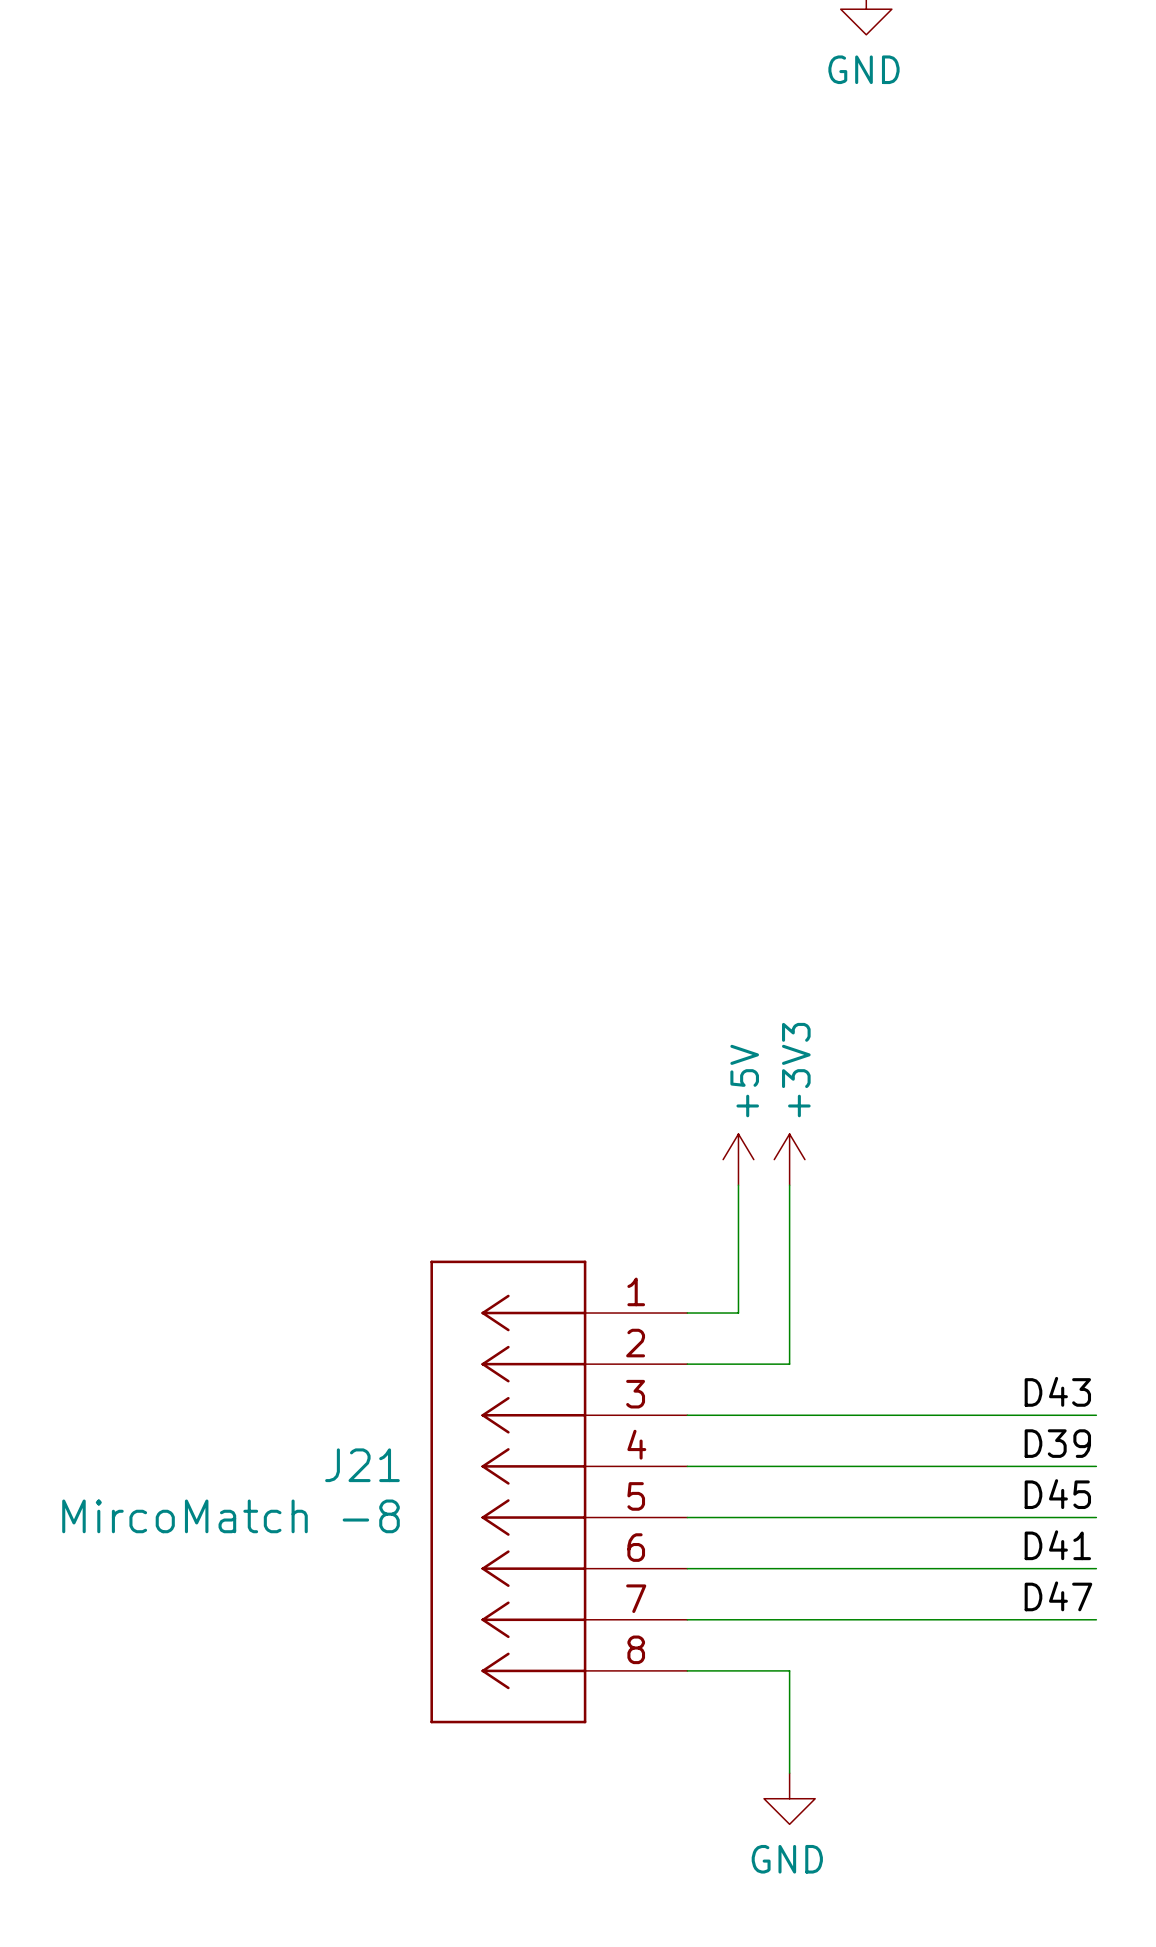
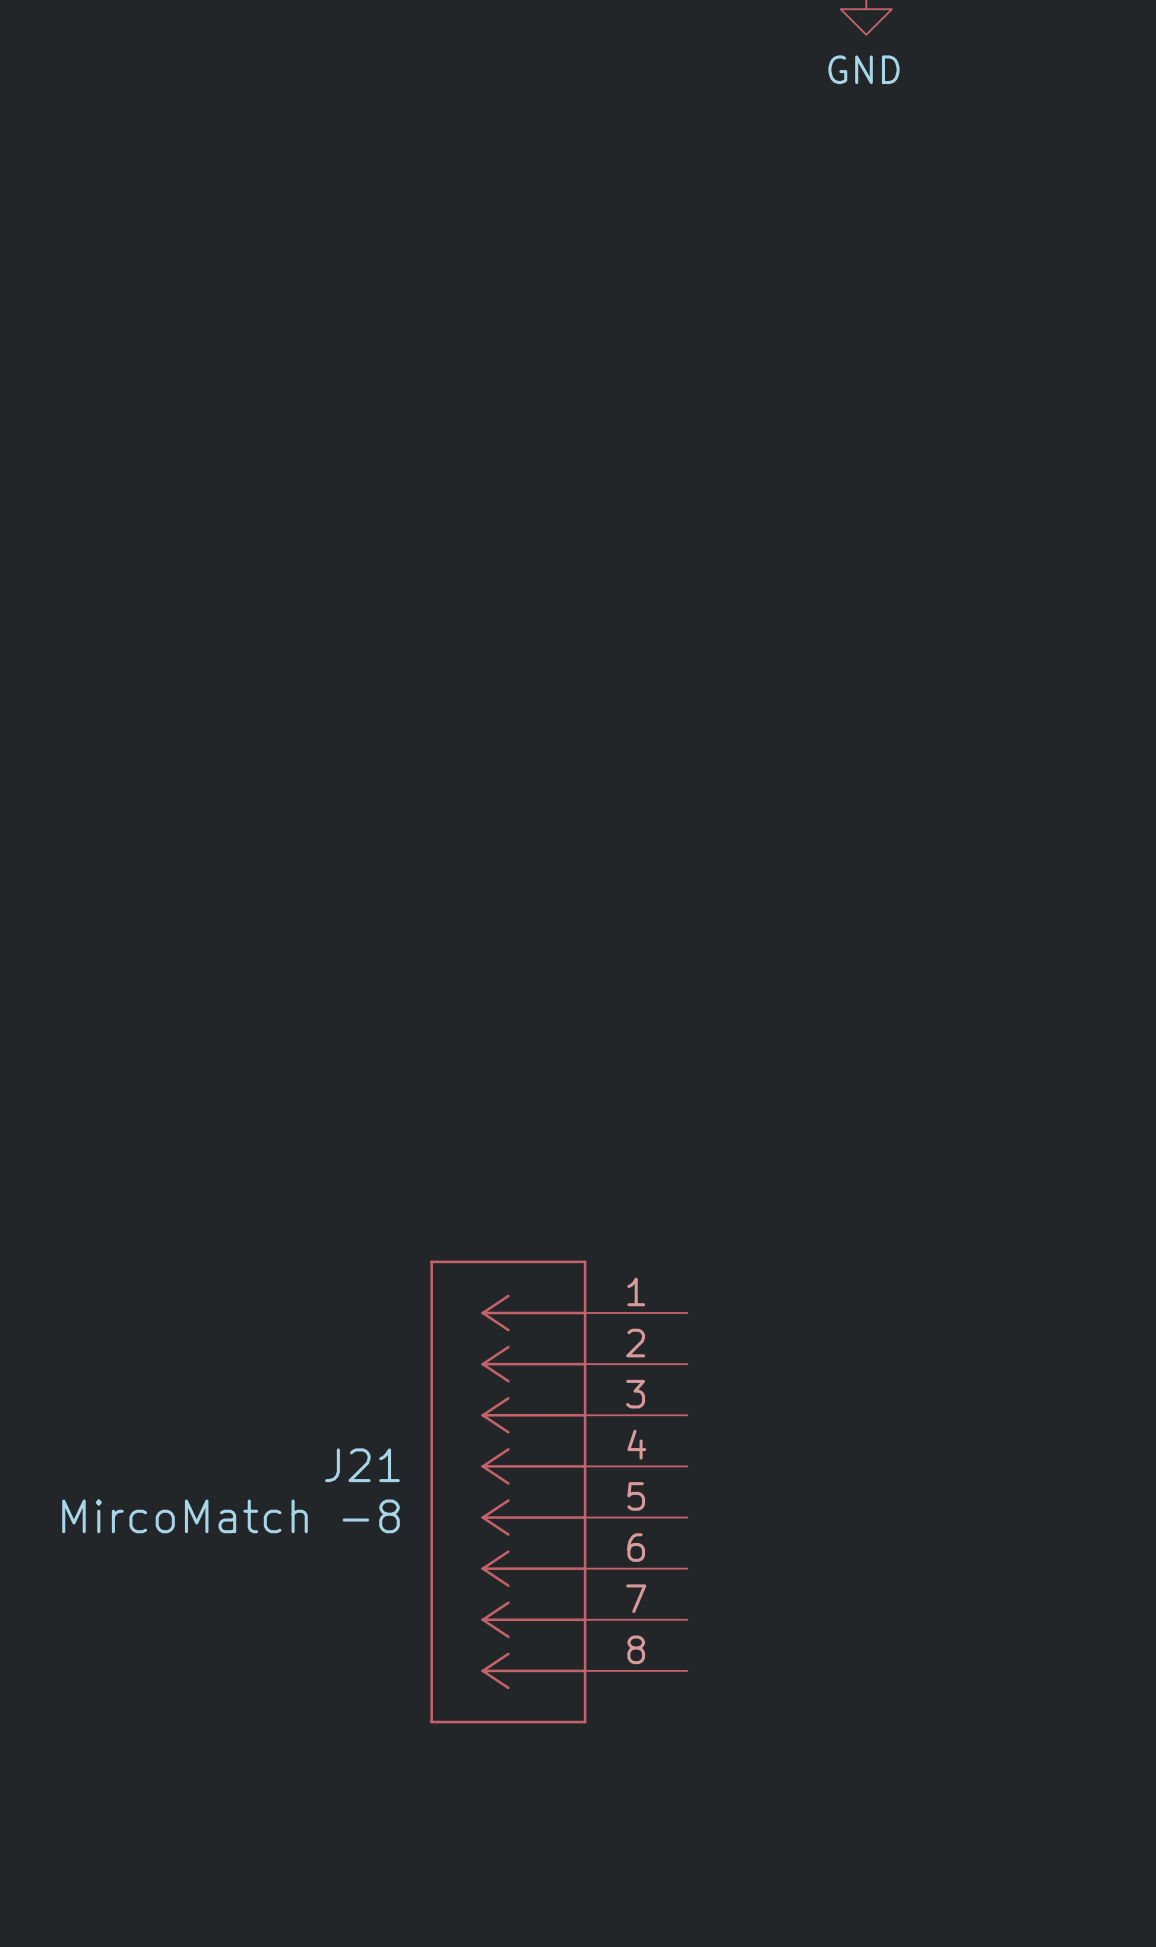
power symbol: +5V (738, 1159) -> none
power symbol: +3V3 (789, 1159) -> none
wire: (738, 1185) (738, 1313) (687, 1313) -> none
wire: (789, 1185) (789, 1364) (687, 1364) -> none
label: D43 (1057, 1391) -> none
wire: (687, 1415) (1096, 1415) -> none
label: D39 (1057, 1443) -> none
wire: (687, 1466) (1096, 1466) -> none
label: D45 (1057, 1494) -> none
wire: (687, 1517) (1096, 1517) -> none
label: D41 (1057, 1545) -> none
wire: (687, 1568) (1096, 1568) -> none
label: D47 (1058, 1596) -> none
wire: (687, 1619) (1096, 1619) -> none
wire: (687, 1670) (789, 1670) (789, 1773) -> none
power symbol: GND (789, 1798) -> none

